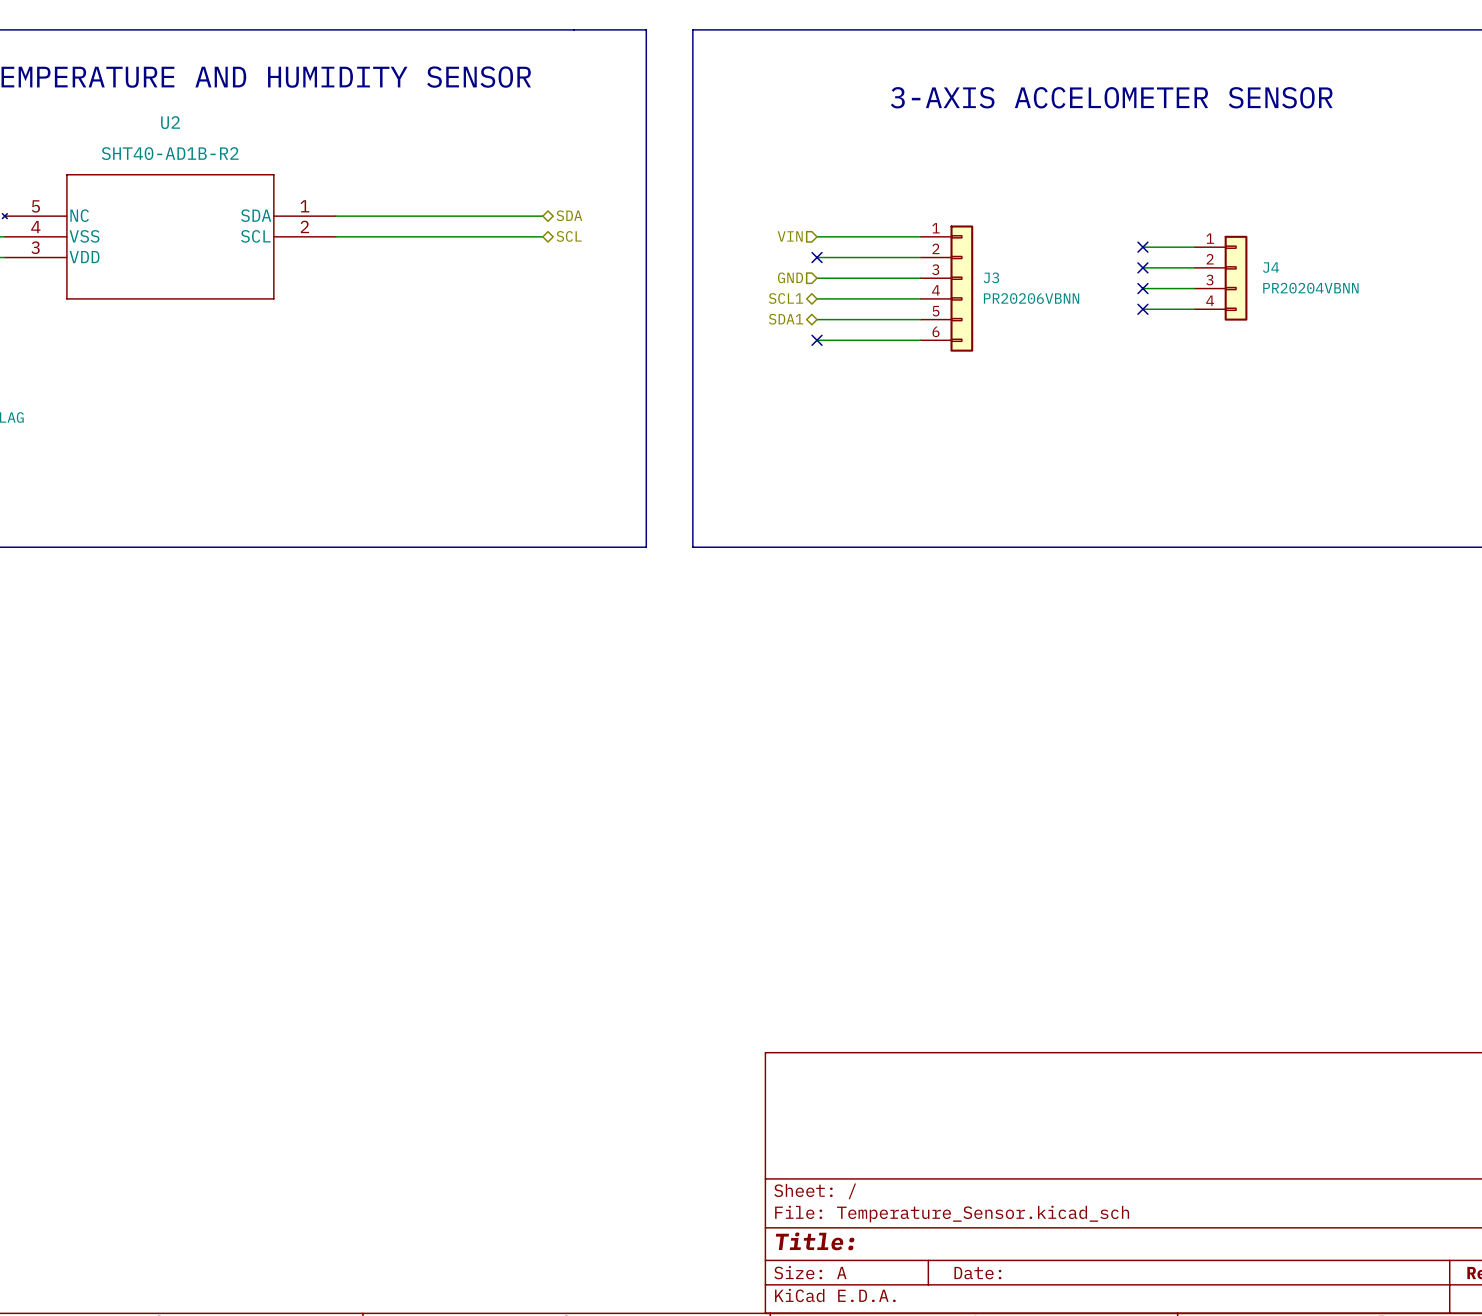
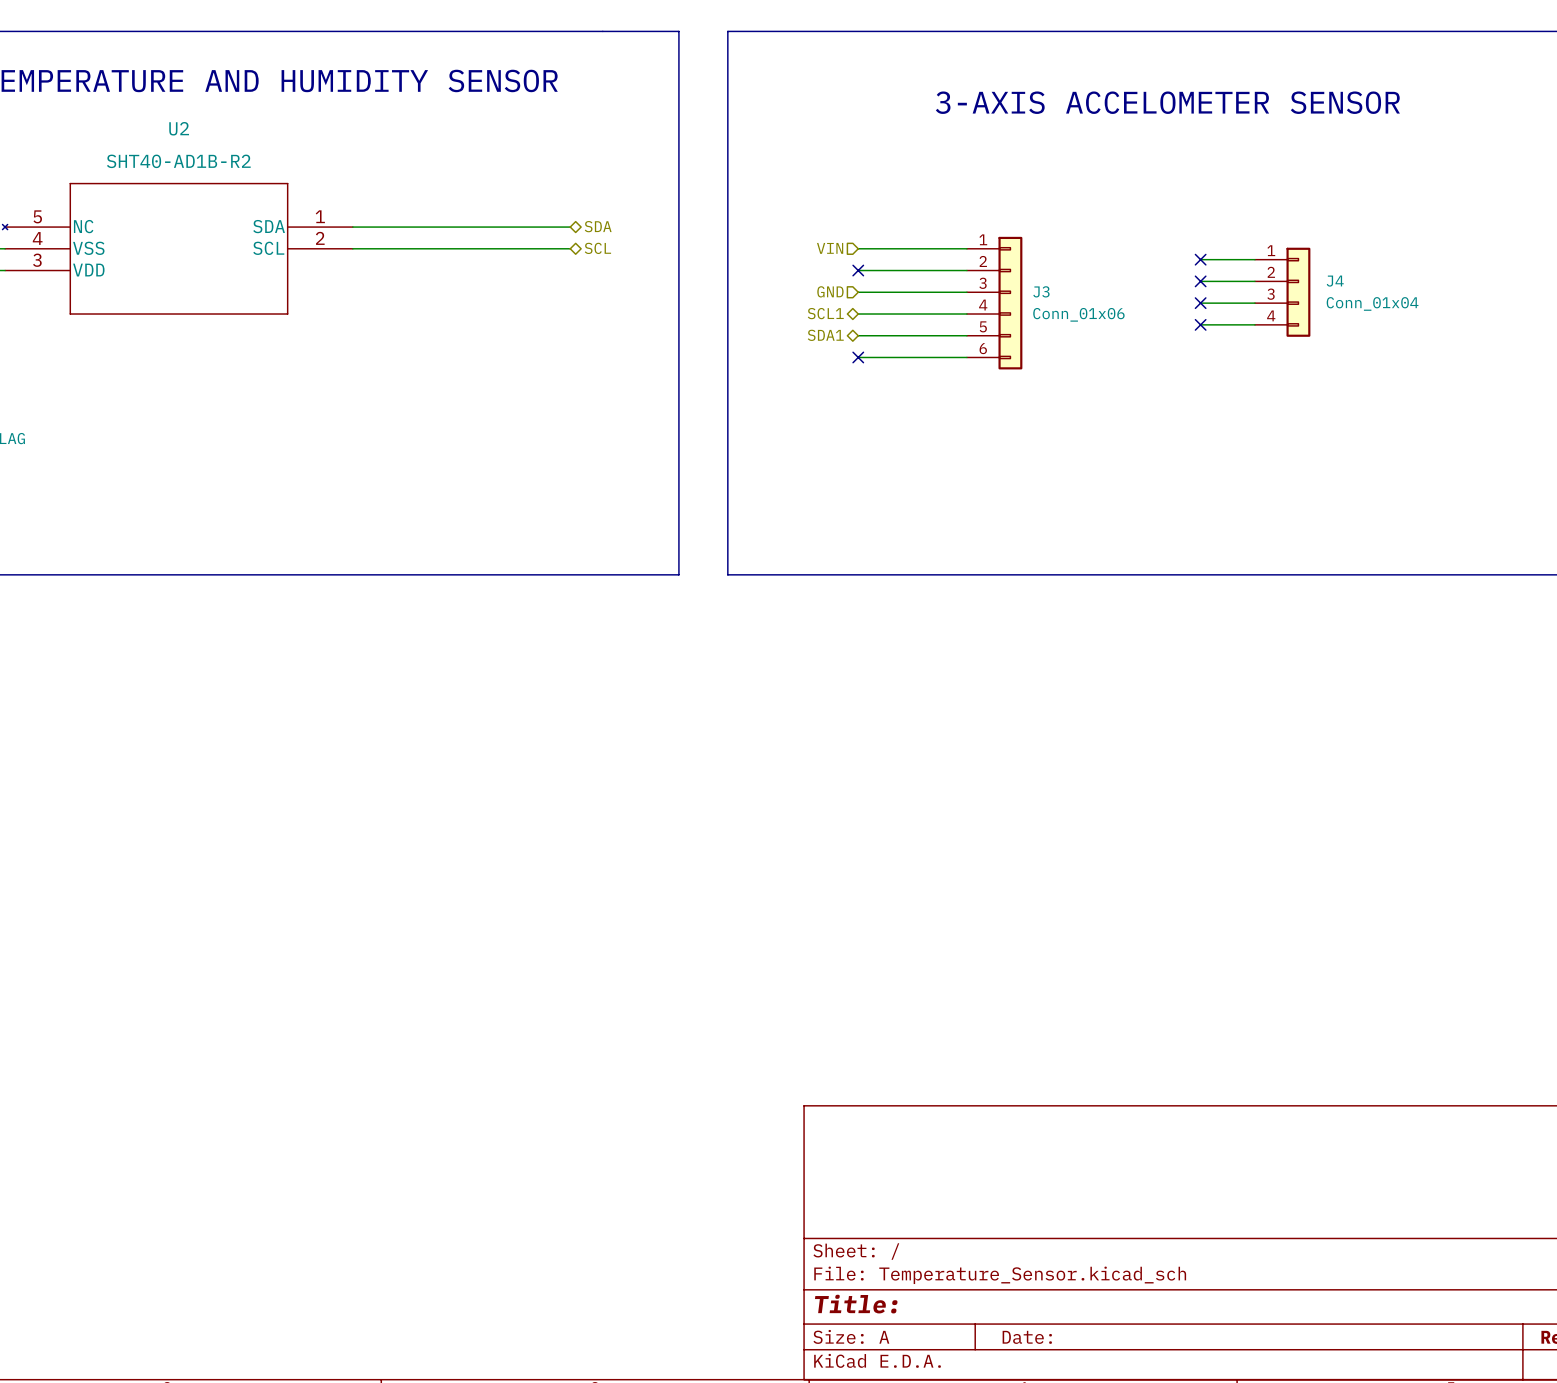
J4 value: PR20204VBNN (1310, 288) -> Conn_01x04 (1372, 303)
J3 value: PR20206VBNN (1031, 298) -> Conn_01x06 (1078, 314)

